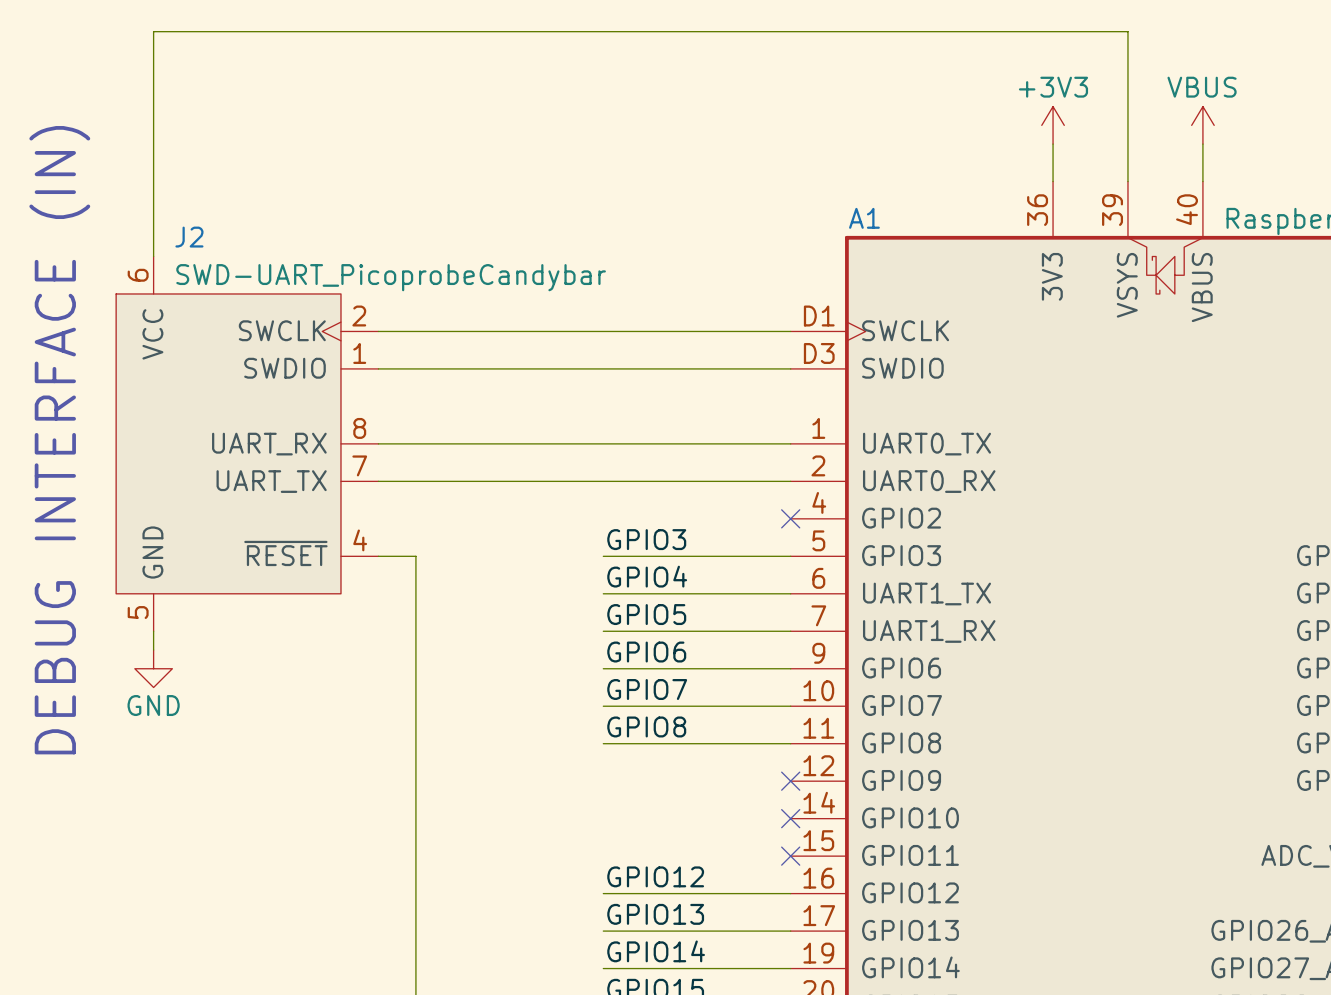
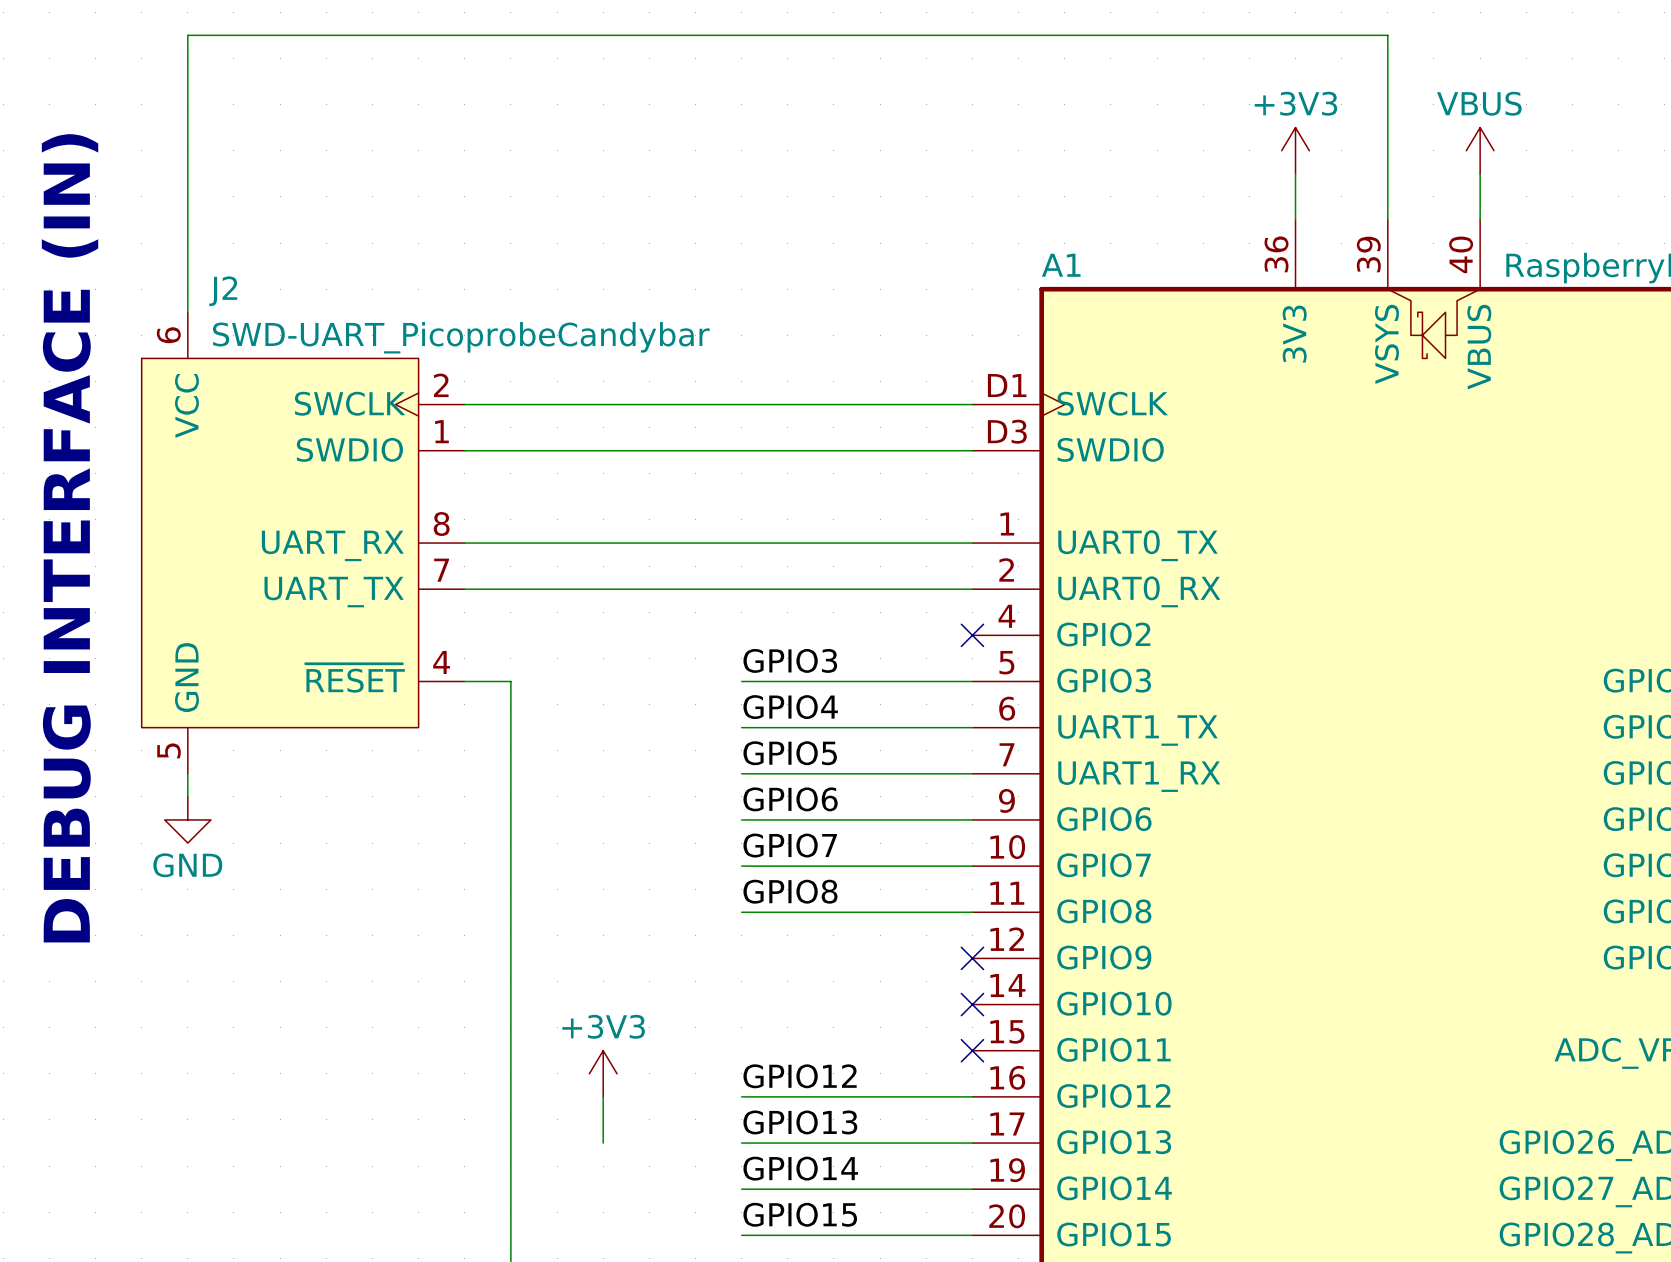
power symbol: none -> +3V3 (603, 1073)
wire: none -> (603, 1096) (603, 1143)

